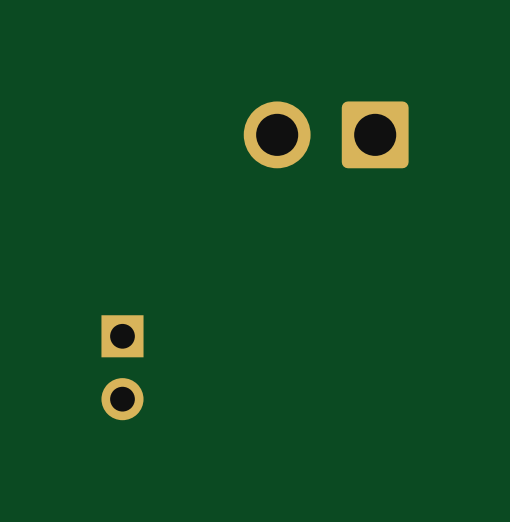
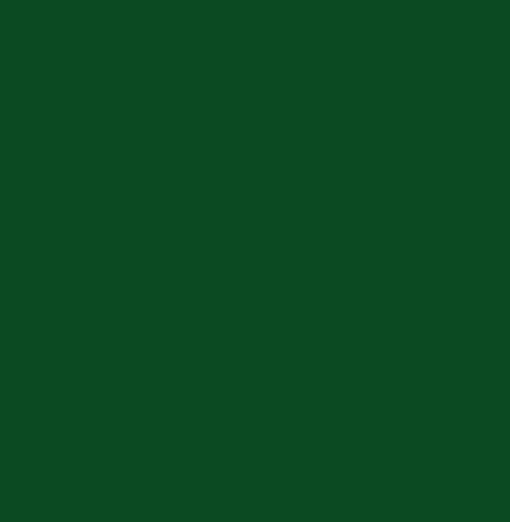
part: (326, 134) -> none
part: (122, 367) -> none

